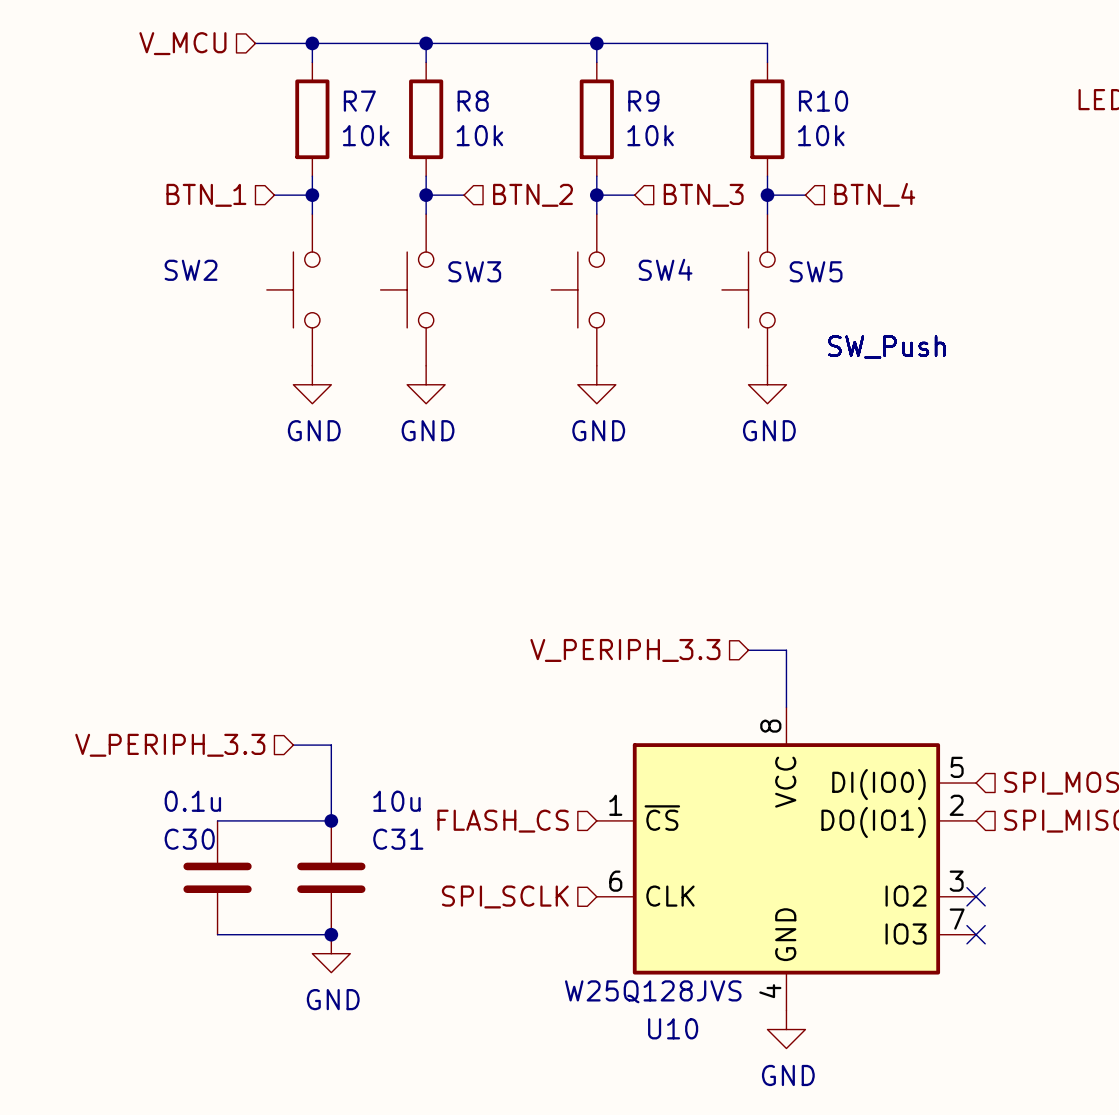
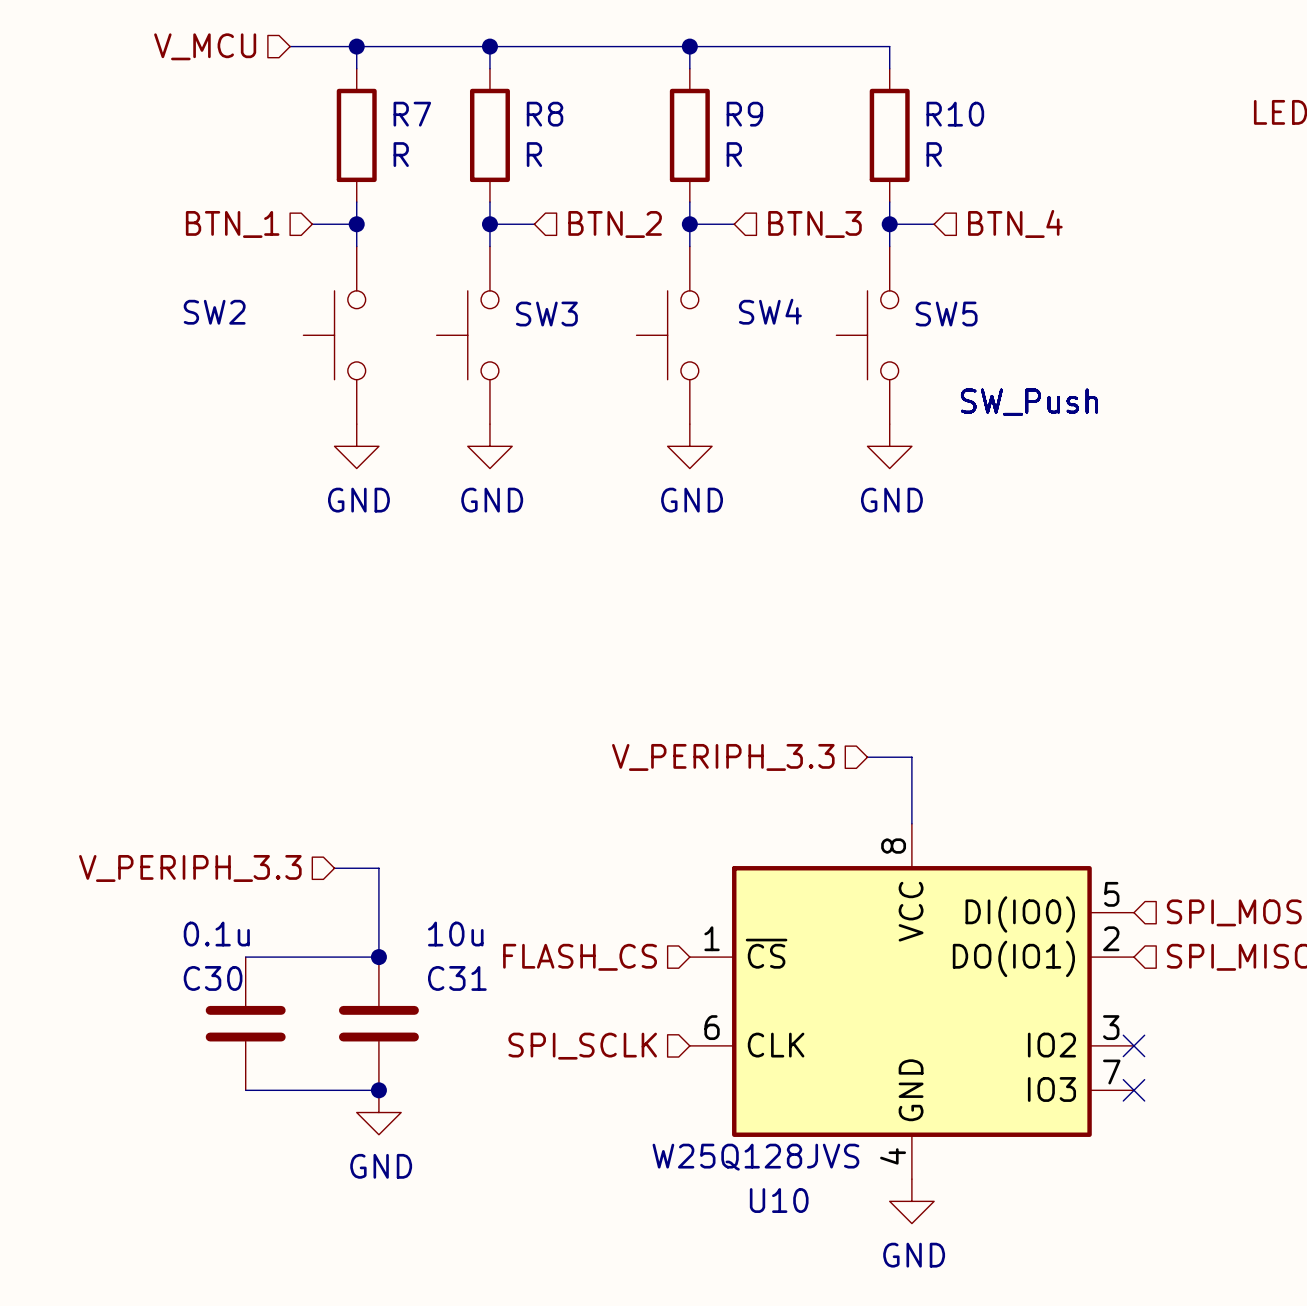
R7 value: 10k (366, 135) -> R (401, 154)
R8 value: 10k (479, 135) -> R (534, 154)
R9 value: 10k (650, 135) -> R (734, 154)
R10 value: 10k (821, 135) -> R (934, 154)

